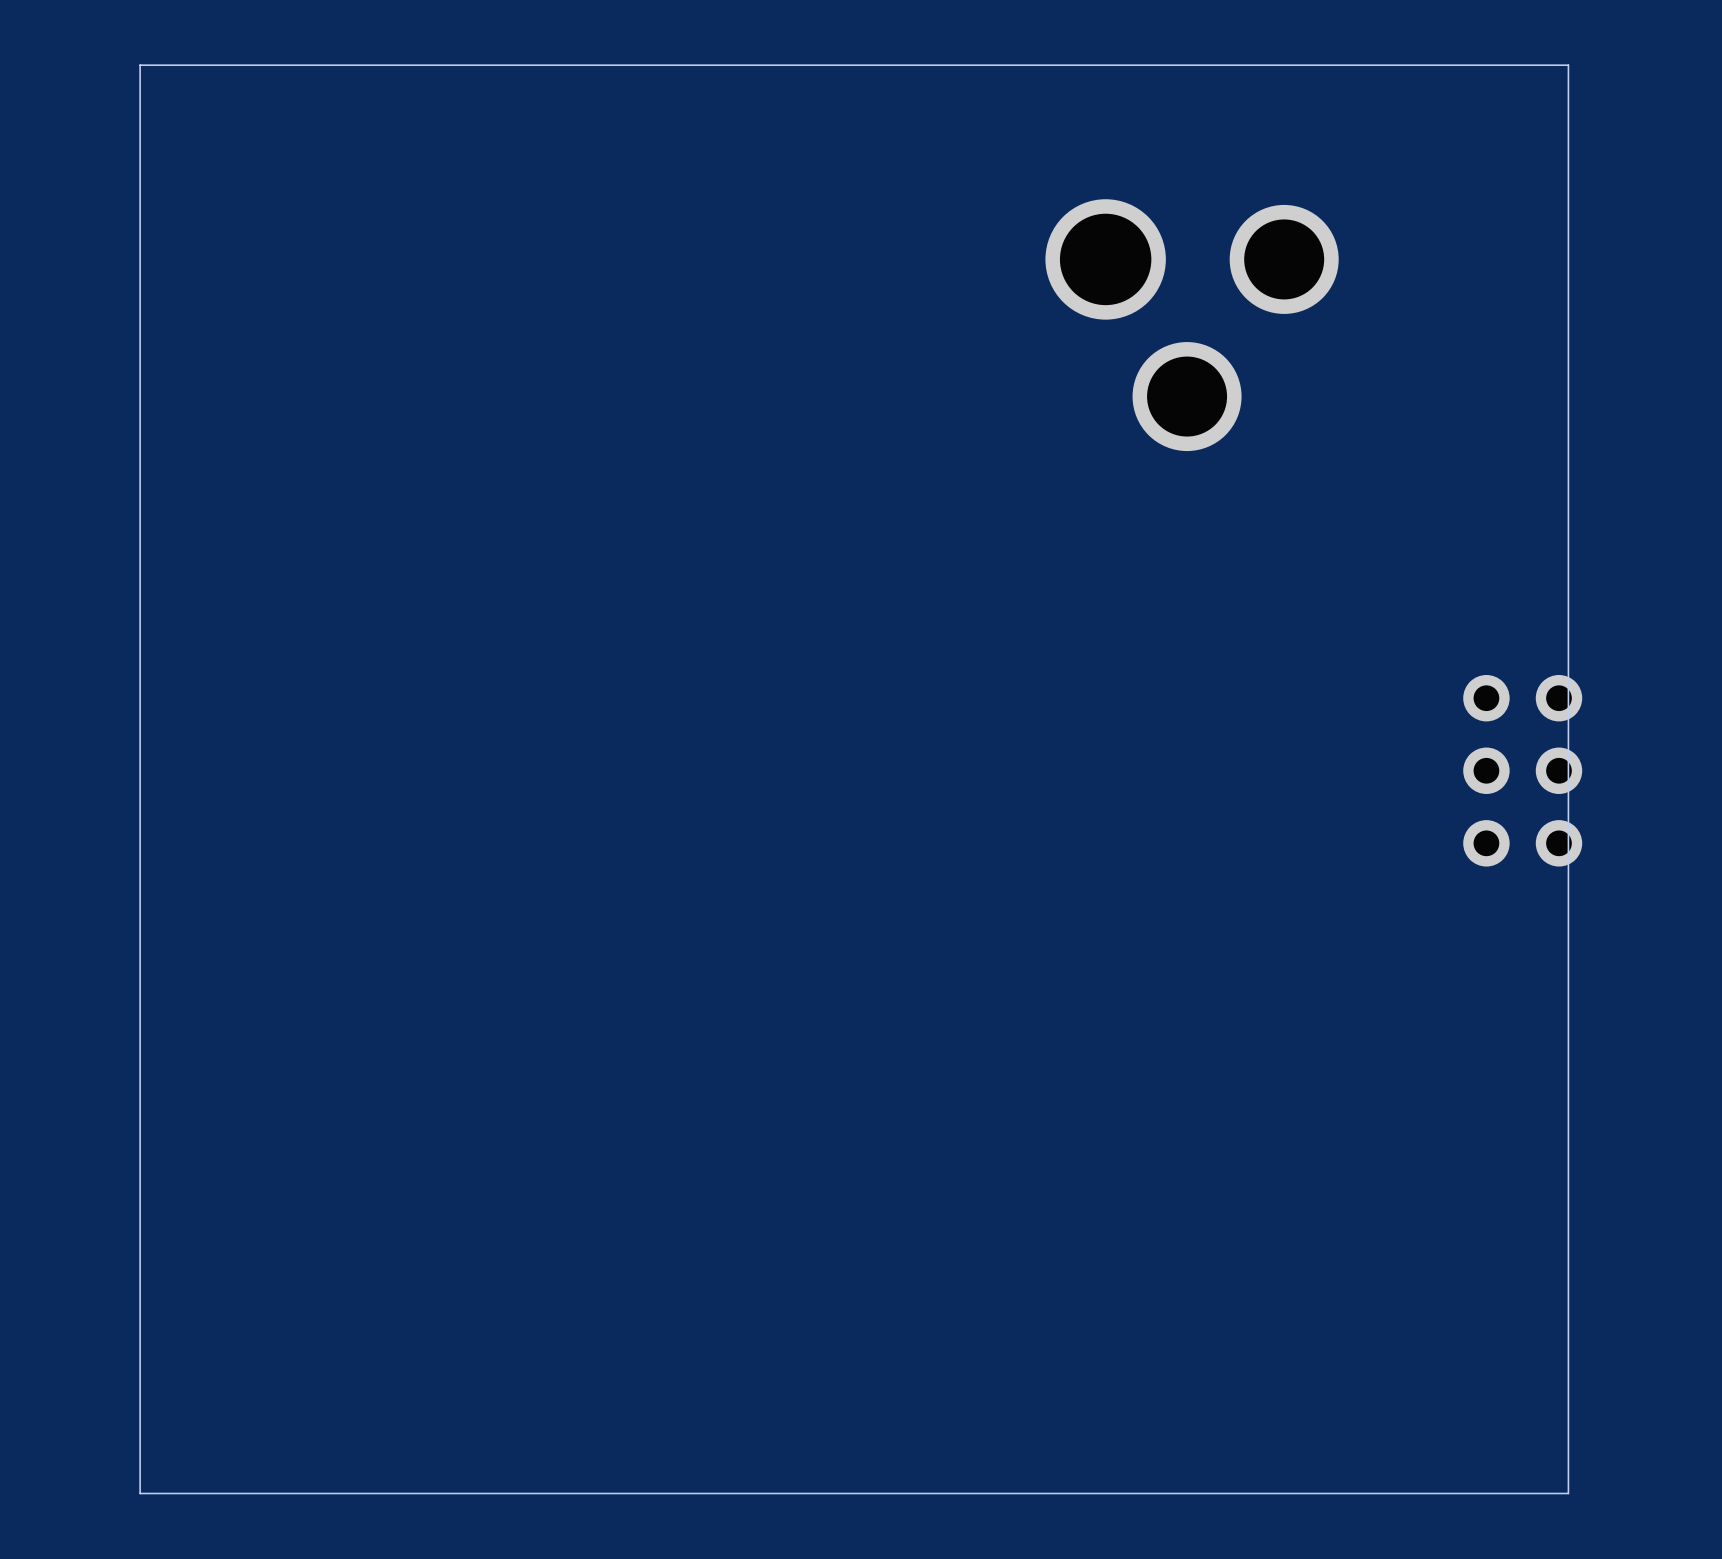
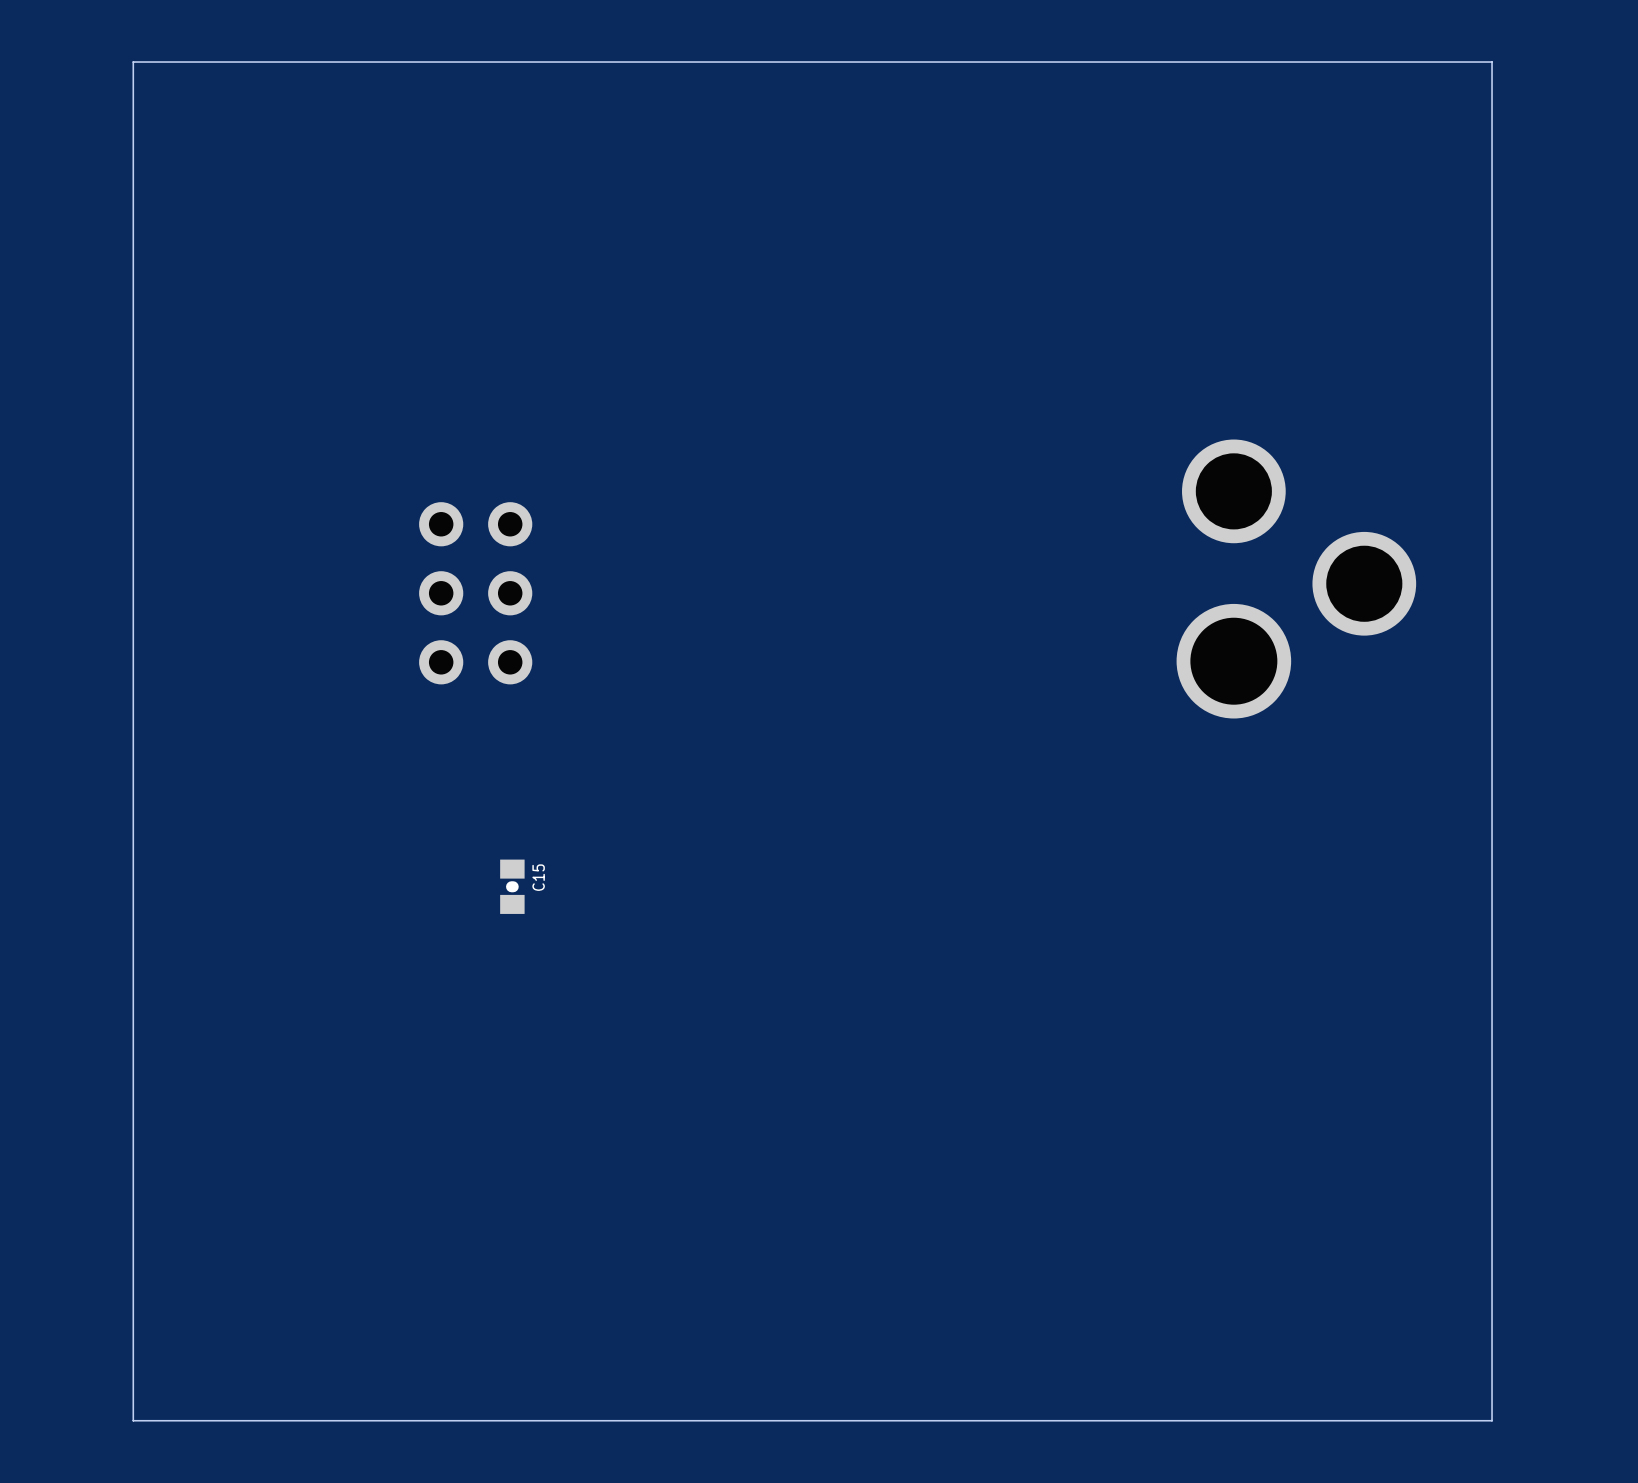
part rotation: 0° (1192, 325) -> 90° counterclockwise (1296, 579)
part position: (1192, 325) -> (1296, 579)
part: none -> (475, 593)
part: (1522, 770) -> none
C15: none -> (512, 886)

